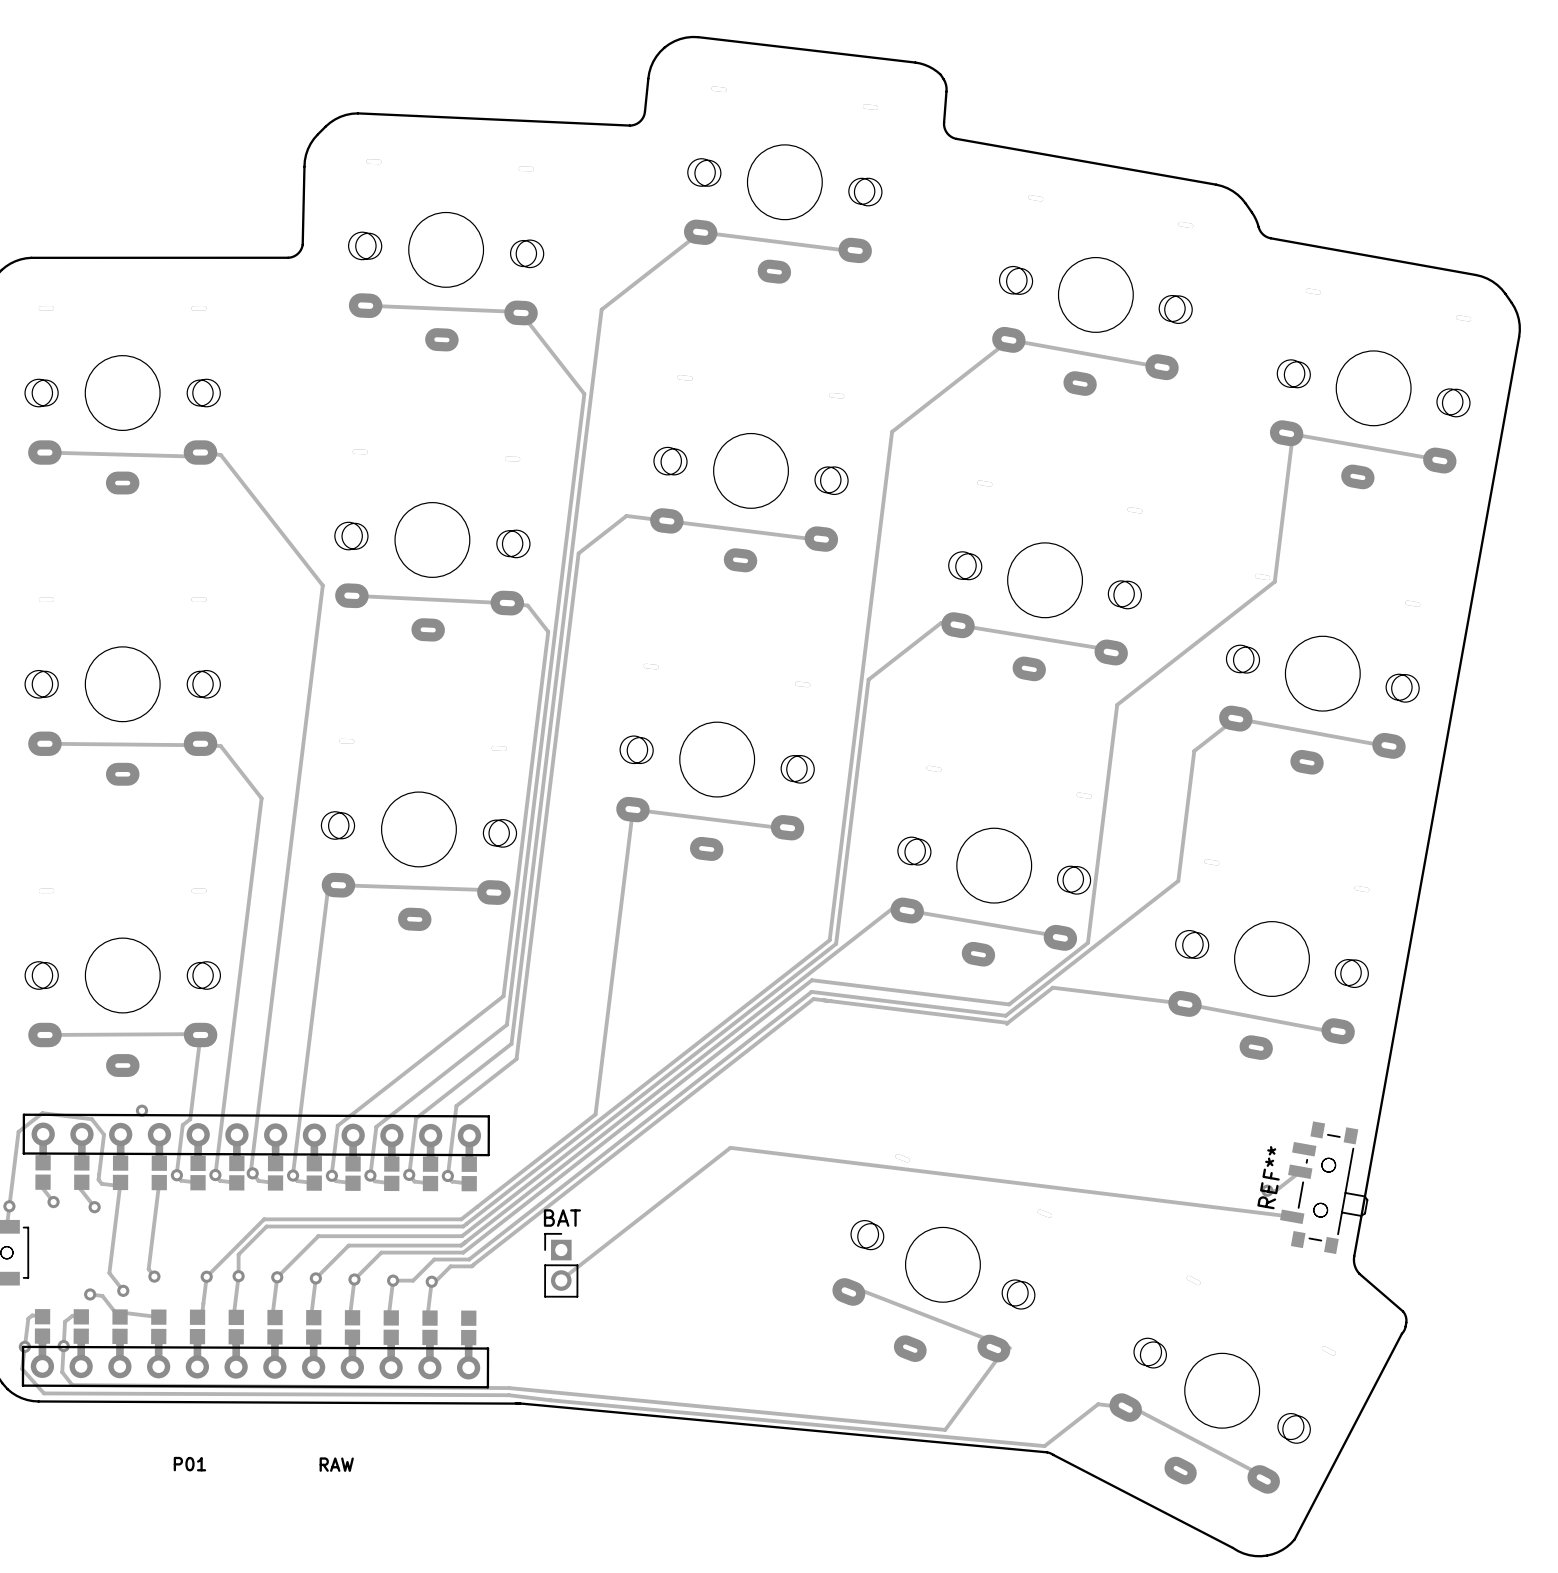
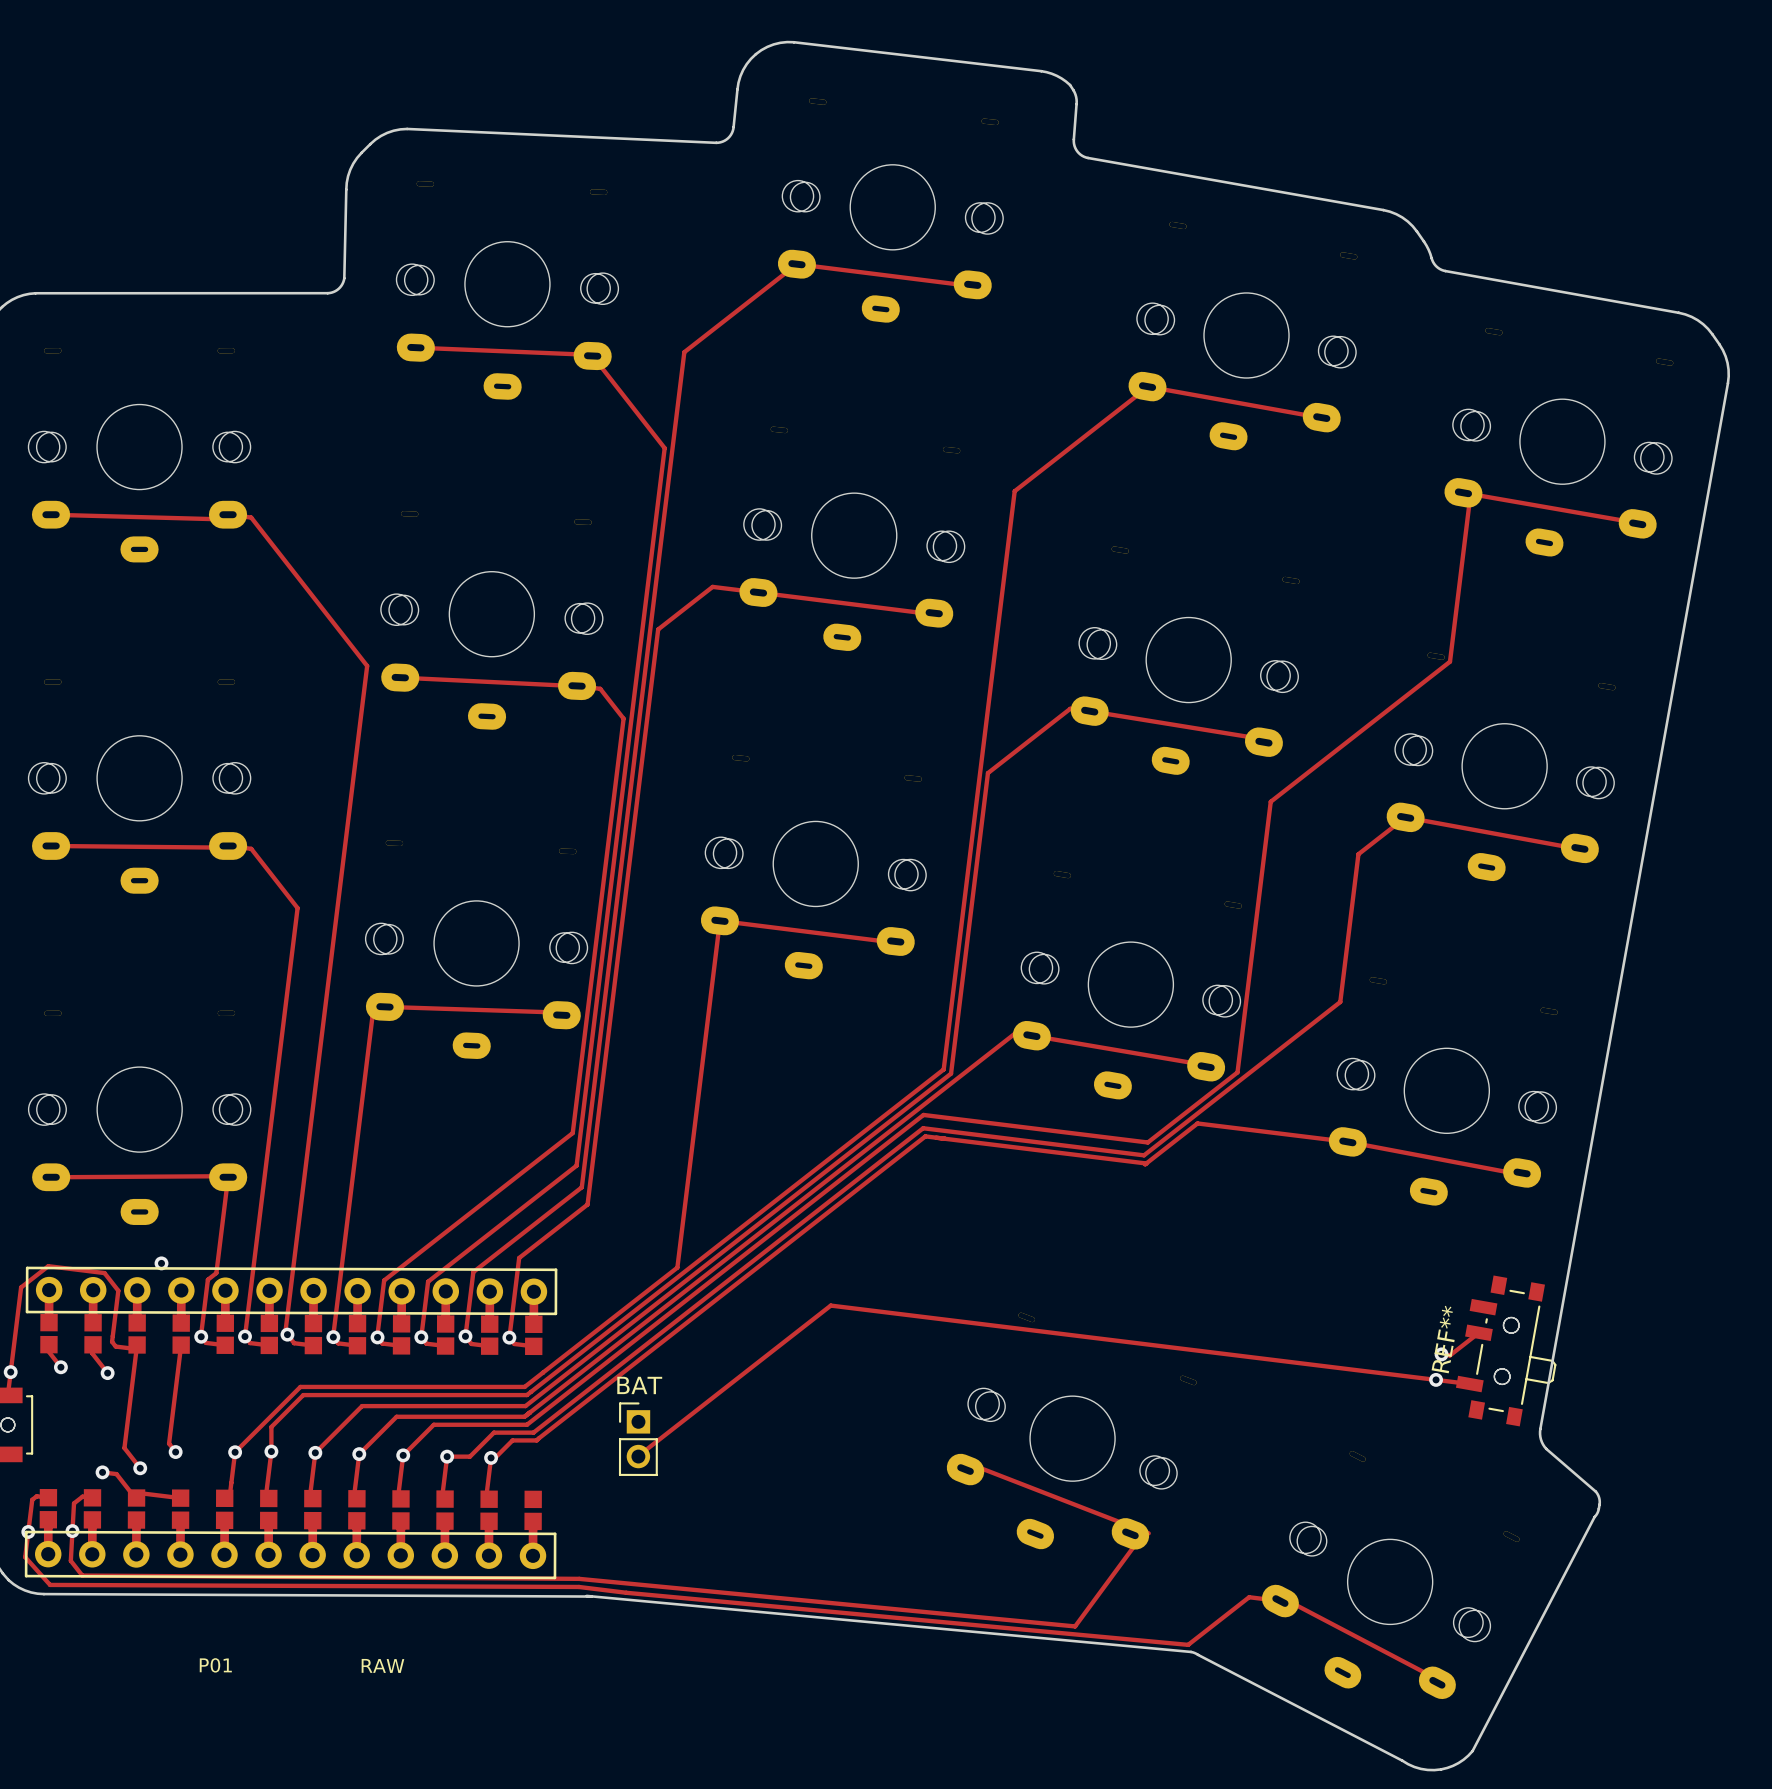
via: none -> (1436, 1379)

